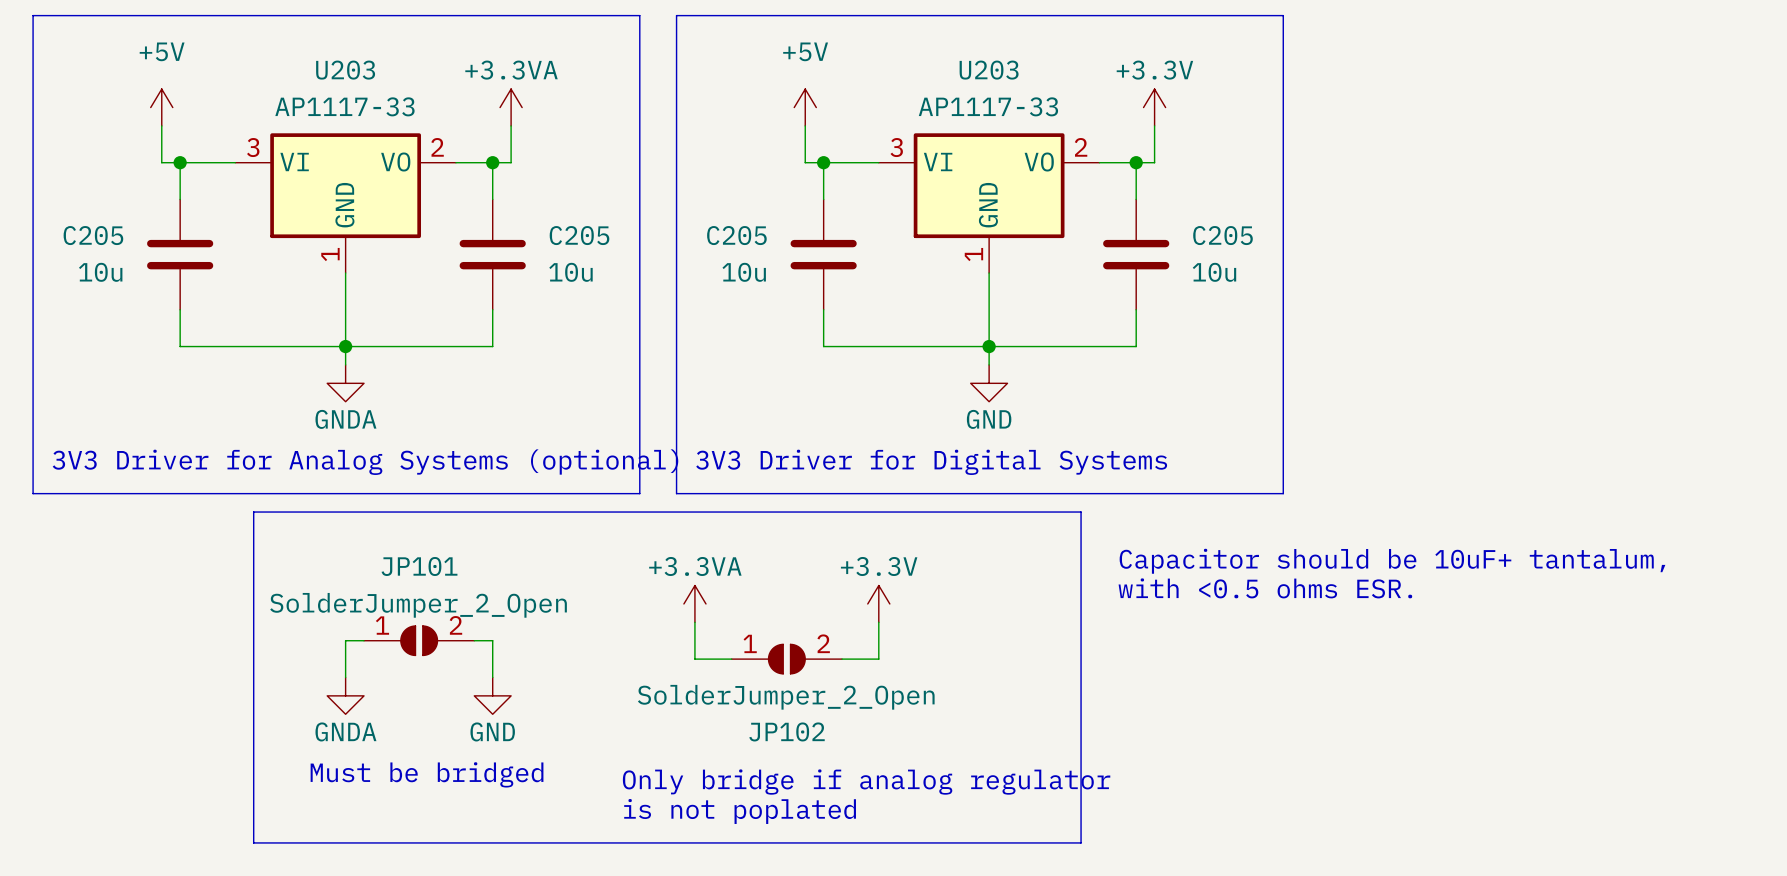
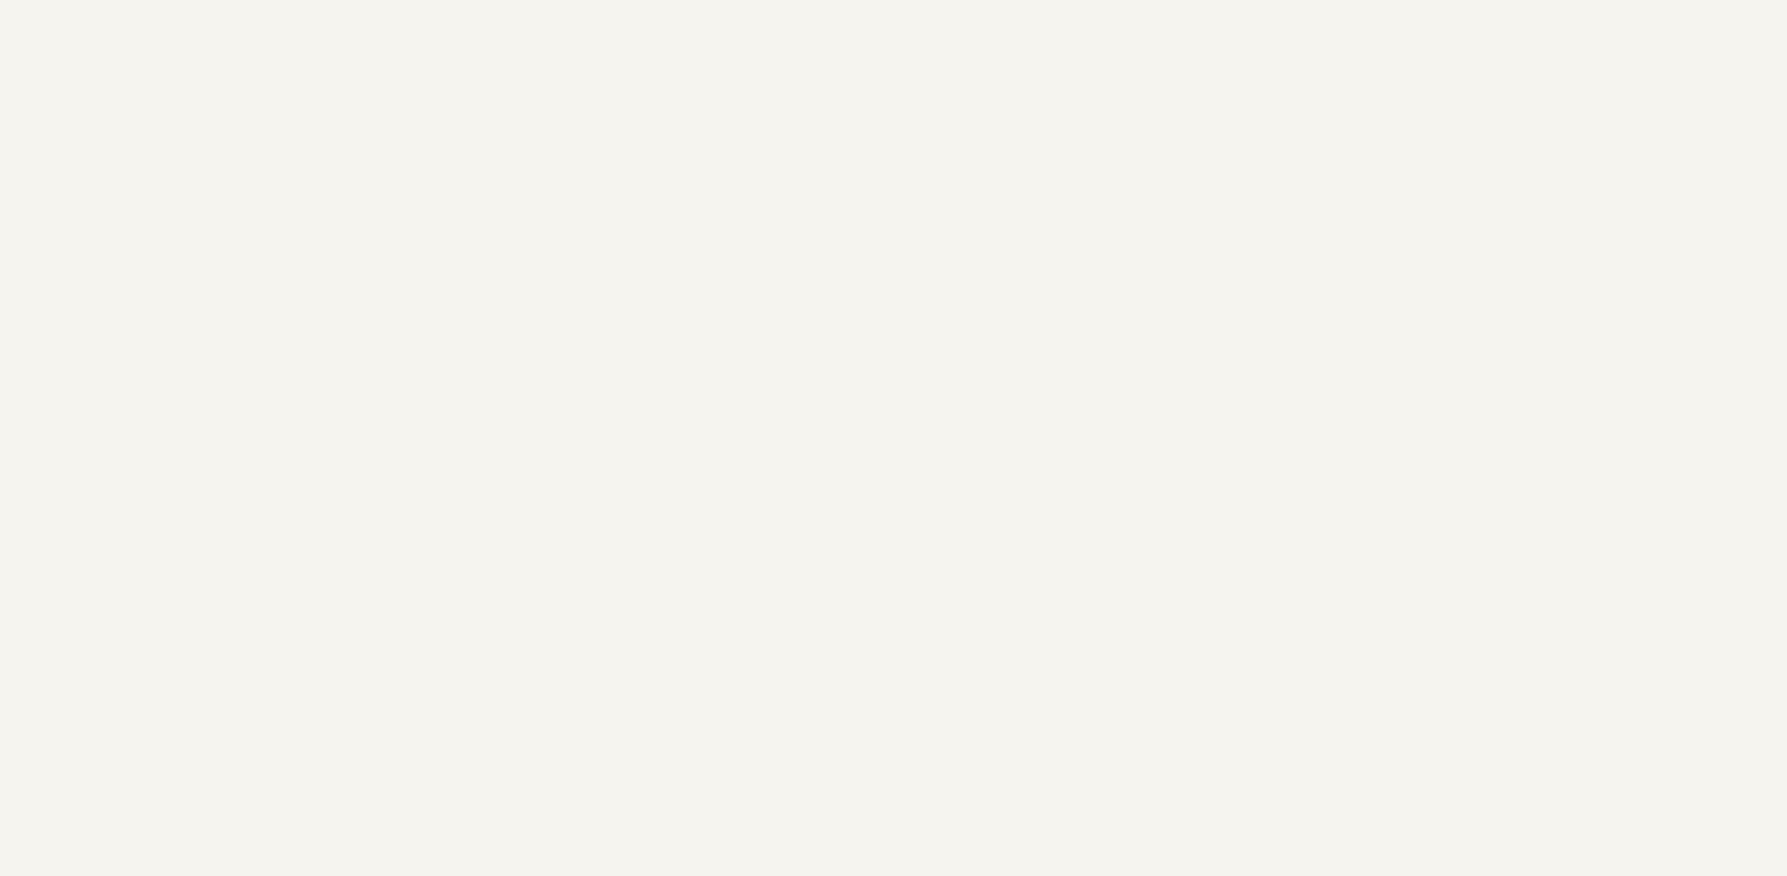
line: (33, 15) (639, 15) (639, 493) (33, 493) (33, 15) -> none
line: (676, 15) (1283, 15) (1283, 493) (676, 493) (676, 15) -> none
power symbol: +5V (161, 107) -> none
power symbol: +3.3VA (511, 107) -> none
power symbol: +5V (805, 107) -> none
power symbol: +3.3V (1154, 107) -> none
wire: (161, 125) (161, 162) (235, 162) -> none
wire: (511, 125) (511, 162) (455, 162) -> none
wire: (805, 125) (805, 162) (878, 162) -> none
wire: (1154, 125) (1154, 162) (1099, 162) -> none
wire: (180, 162) (180, 199) -> none
junction: (180, 162) -> none
wire: (492, 162) (492, 199) -> none
junction: (492, 162) -> none
wire: (823, 162) (823, 199) -> none
junction: (823, 162) -> none
wire: (1136, 162) (1136, 199) -> none
junction: (1136, 162) -> none
U203: AP1117-33 (345, 203) -> none
U203: AP1117-33 (989, 203) -> none
C205: 10u (180, 254) -> none
C205: 10u (492, 254) -> none
C205: 10u (823, 254) -> none
C205: 10u (1136, 254) -> none
wire: (345, 273) (345, 364) -> none
wire: (989, 273) (989, 364) -> none
wire: (180, 309) (180, 346) (492, 346) (492, 309) -> none
wire: (823, 309) (823, 346) (1136, 346) (1136, 309) -> none
junction: (345, 346) -> none
junction: (989, 346) -> none
power symbol: GNDA (345, 383) -> none
power symbol: GND (989, 383) -> none
text: 3V3 Driver for Analog Systems (optional) (365, 462) -> none
text: 3V3 Driver for Digital Systems (931, 462) -> none
line: (253, 512) (1081, 512) (1081, 842) (253, 842) (253, 512) -> none
text: Capacitor should be 10uF+ tantalum, (1392, 561) -> none
text: with <0.5 ohms ESR. (1265, 588) -> none
power symbol: +3.3VA (694, 603) -> none
power symbol: +3.3V (878, 603) -> none
wire: (694, 622) (694, 659) (731, 659) -> none
wire: (878, 622) (878, 659) (842, 659) -> none
wire: (364, 640) (345, 640) (345, 677) -> none
JP101: SolderJumper_2_Open (419, 640) -> none
wire: (474, 640) (492, 640) (492, 677) -> none
JP102: SolderJumper_2_Open (786, 659) -> none
power symbol: GNDA (345, 695) -> none
power symbol: GND (492, 695) -> none
text: Must be bridged (427, 774) -> none
text: Only bridge if analog regulator (866, 782) -> none
text: is not poplated (740, 811) -> none

